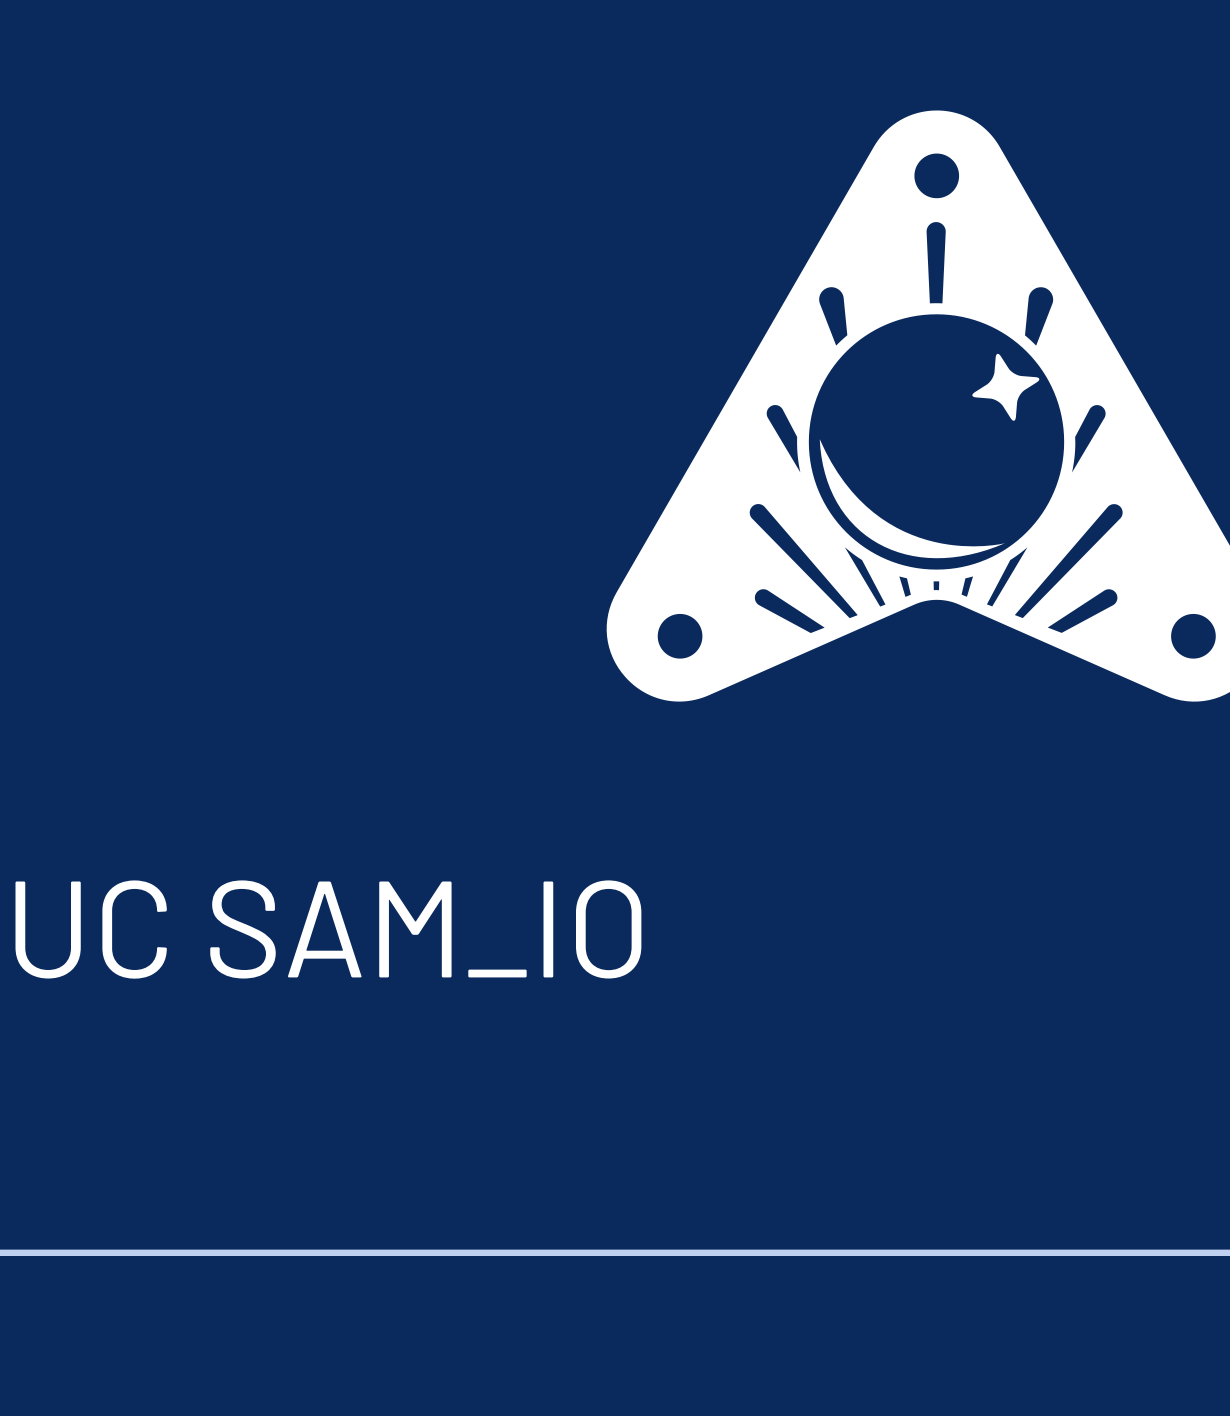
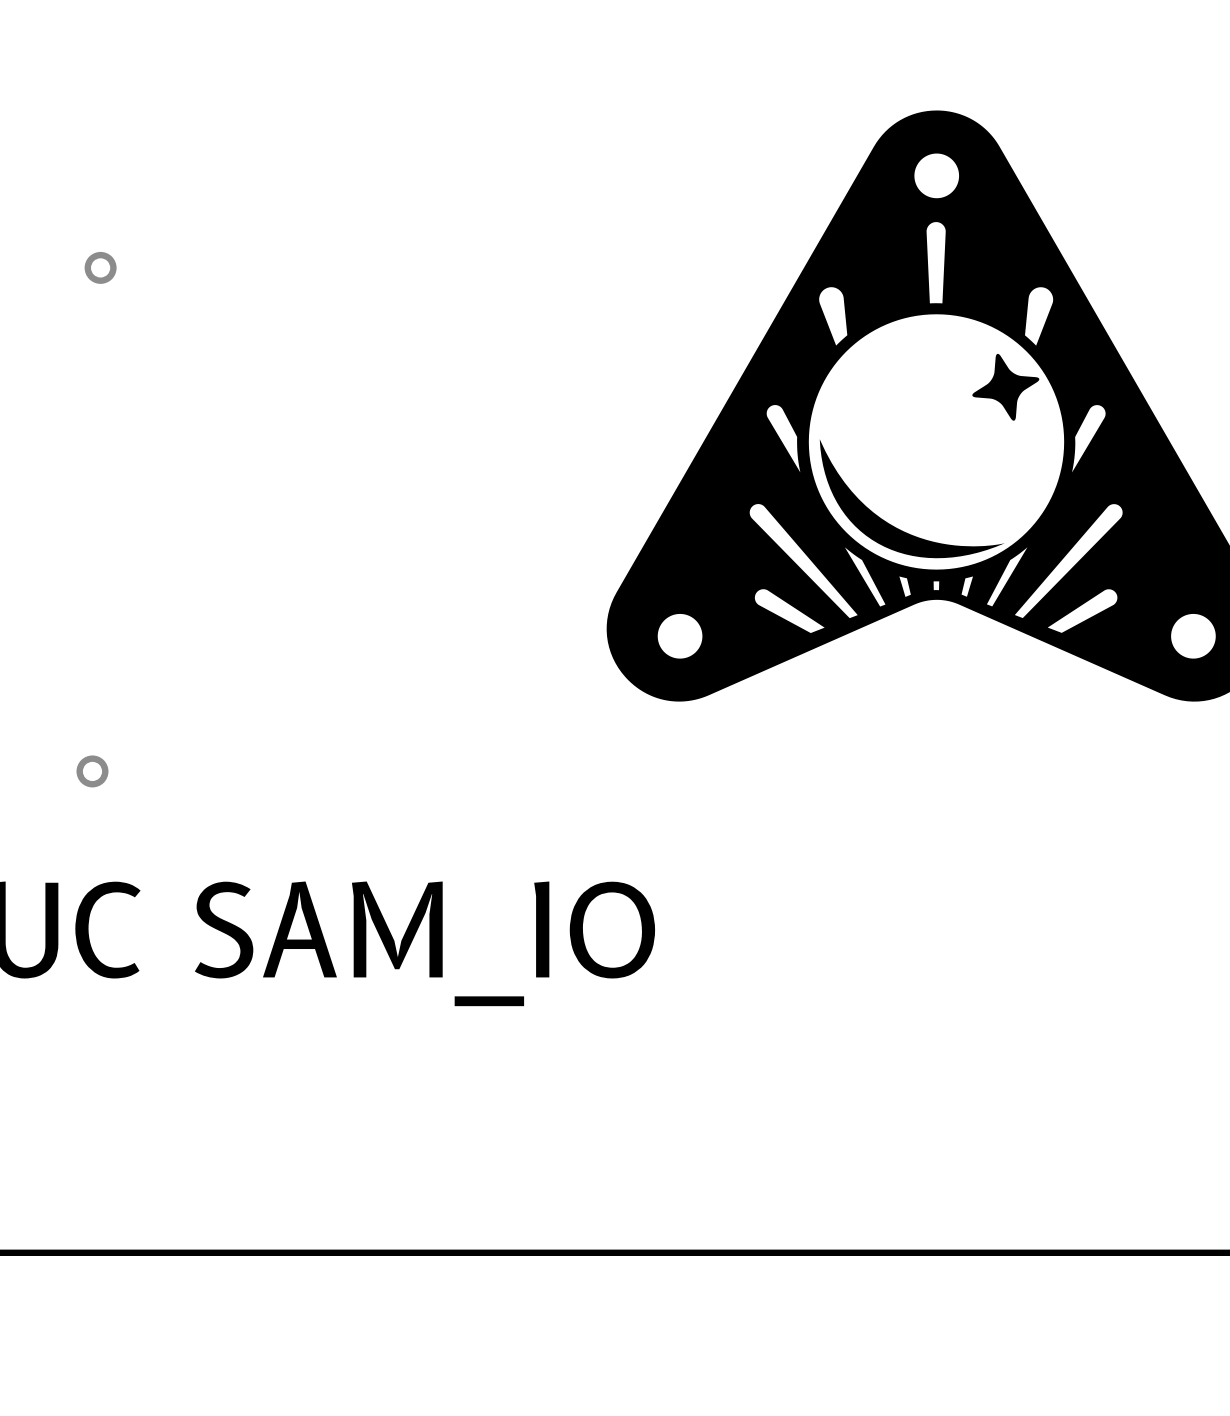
via: none -> (100, 267)
via: none -> (92, 771)

